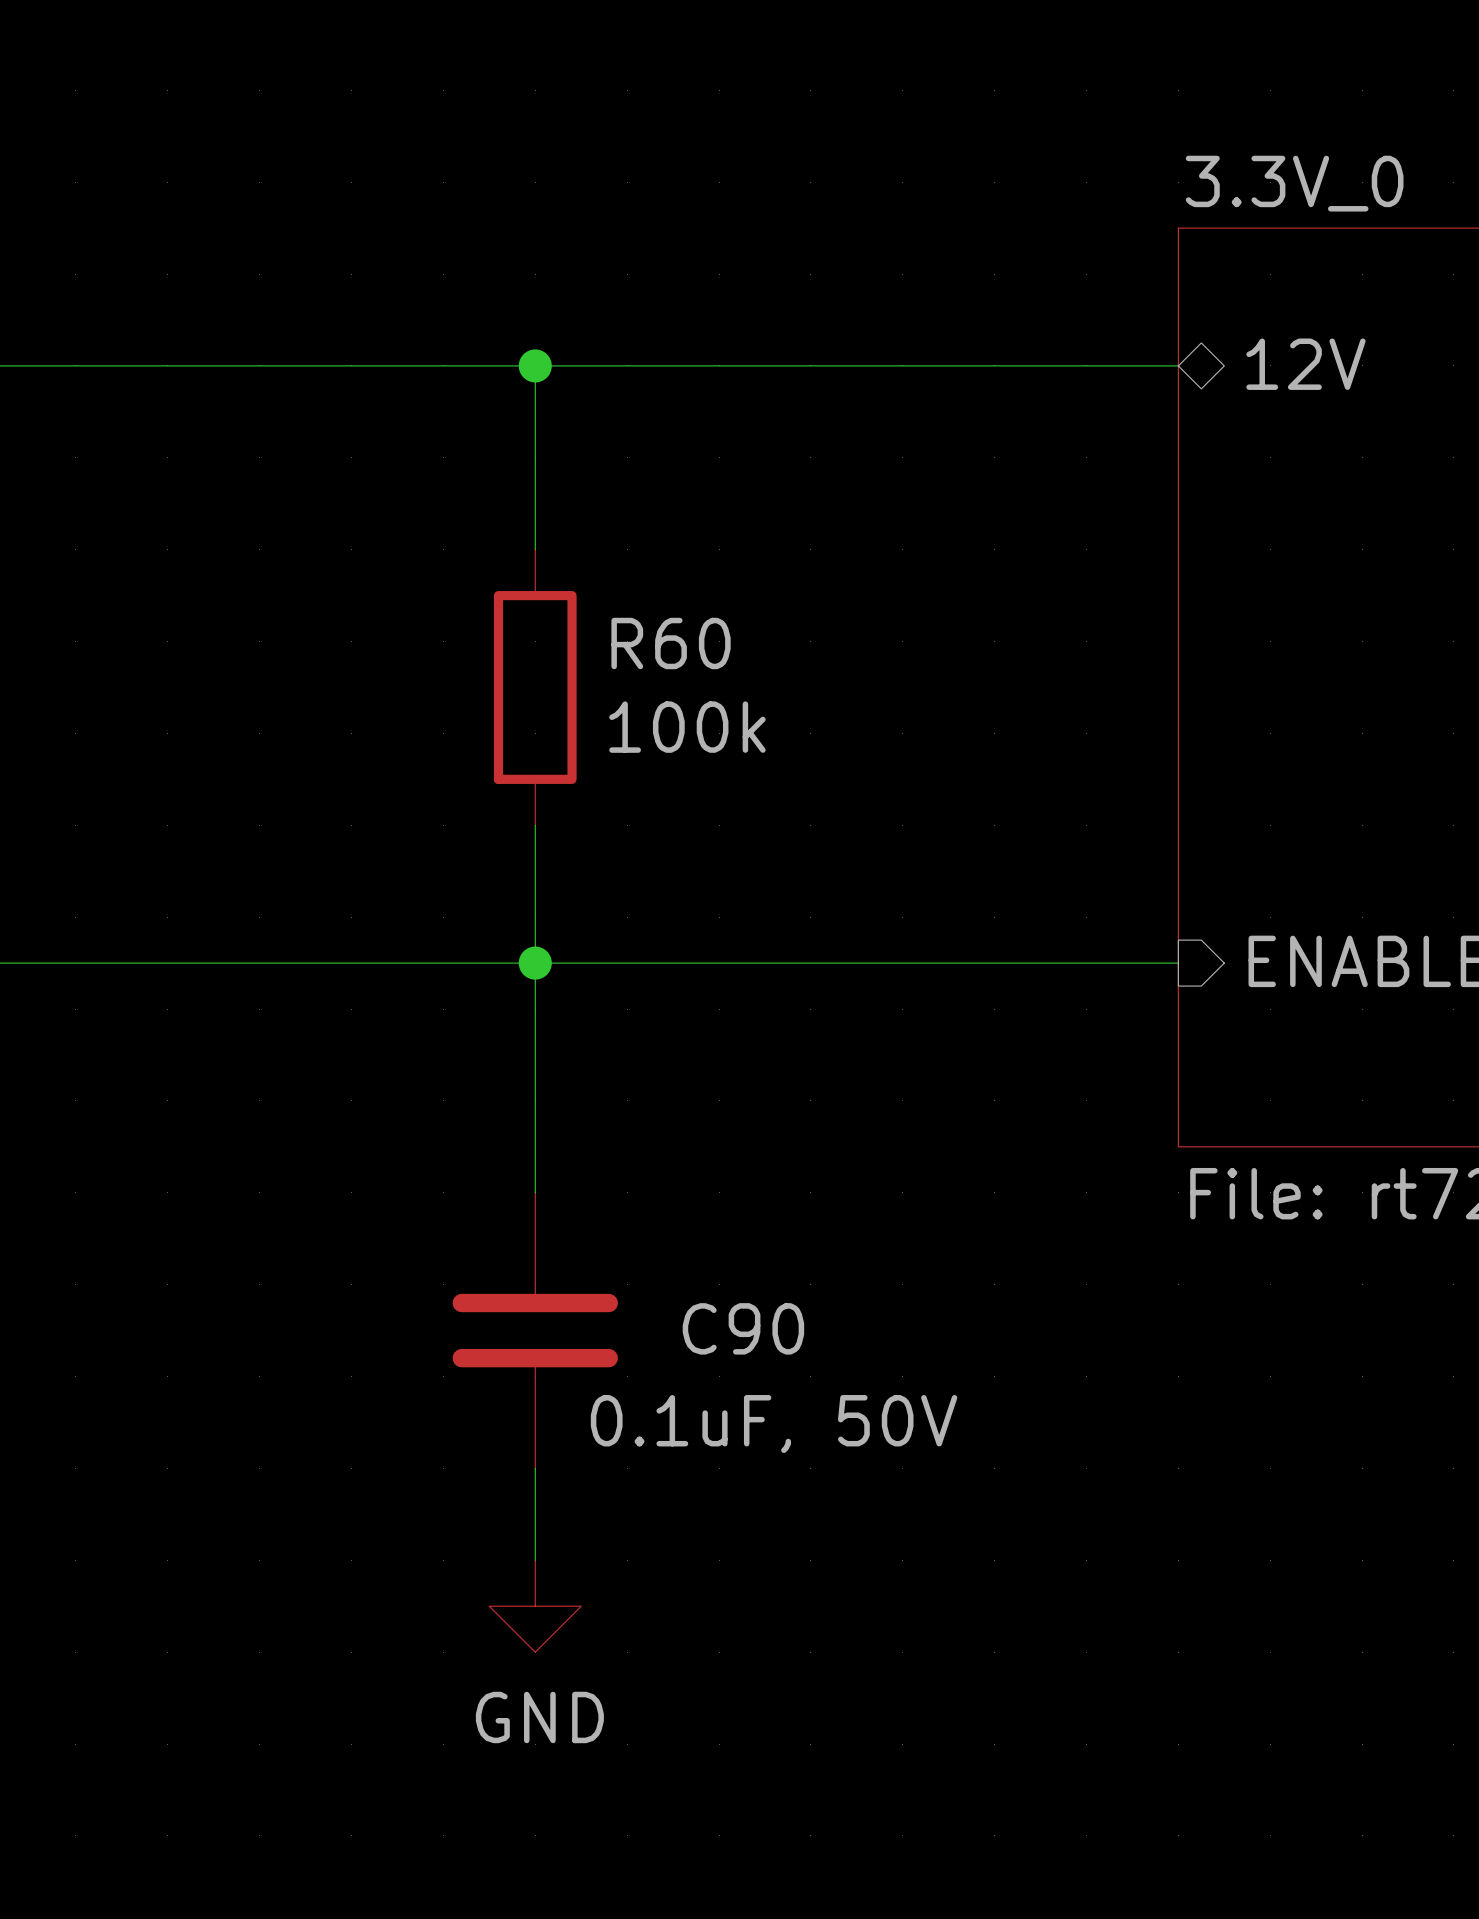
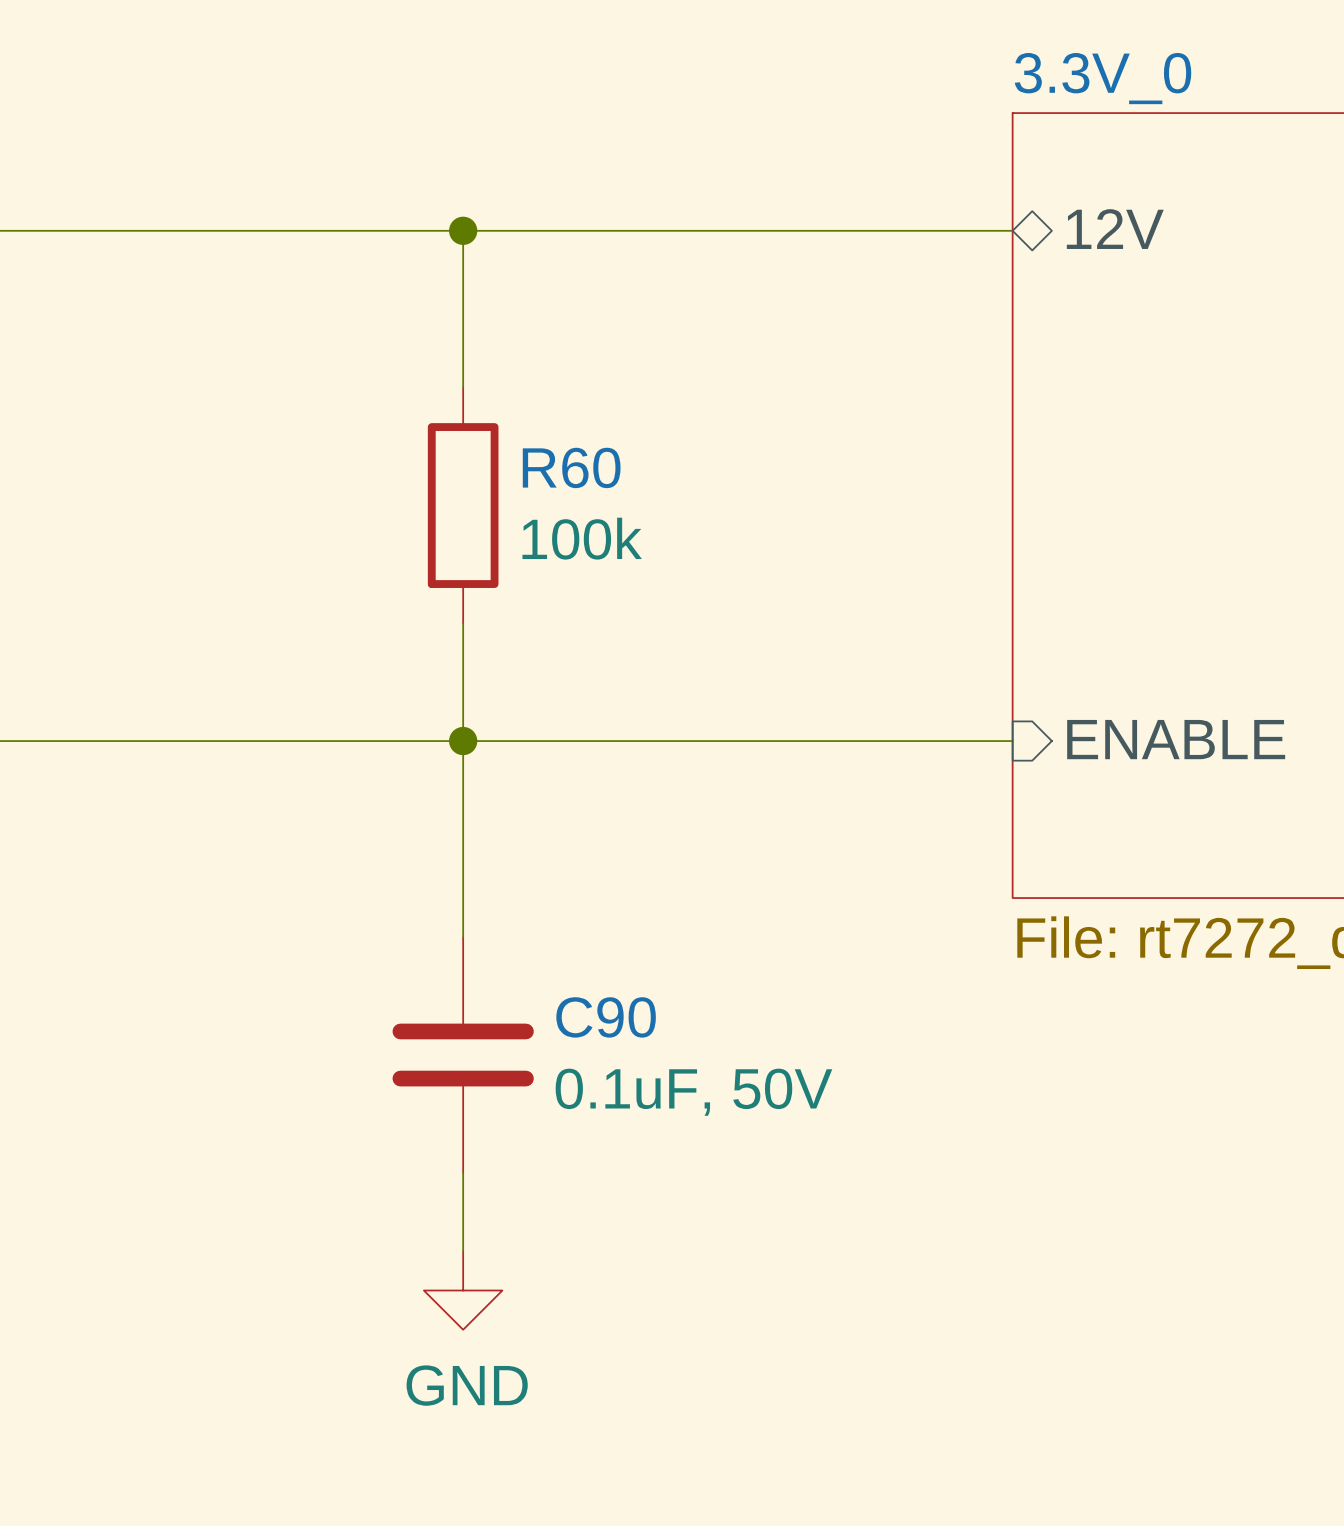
C90 name position: C90 (743, 1328) -> C90 (606, 1017)
C90 value position: 0.1uF, 50V (774, 1424) -> 0.1uF, 50V (693, 1092)

